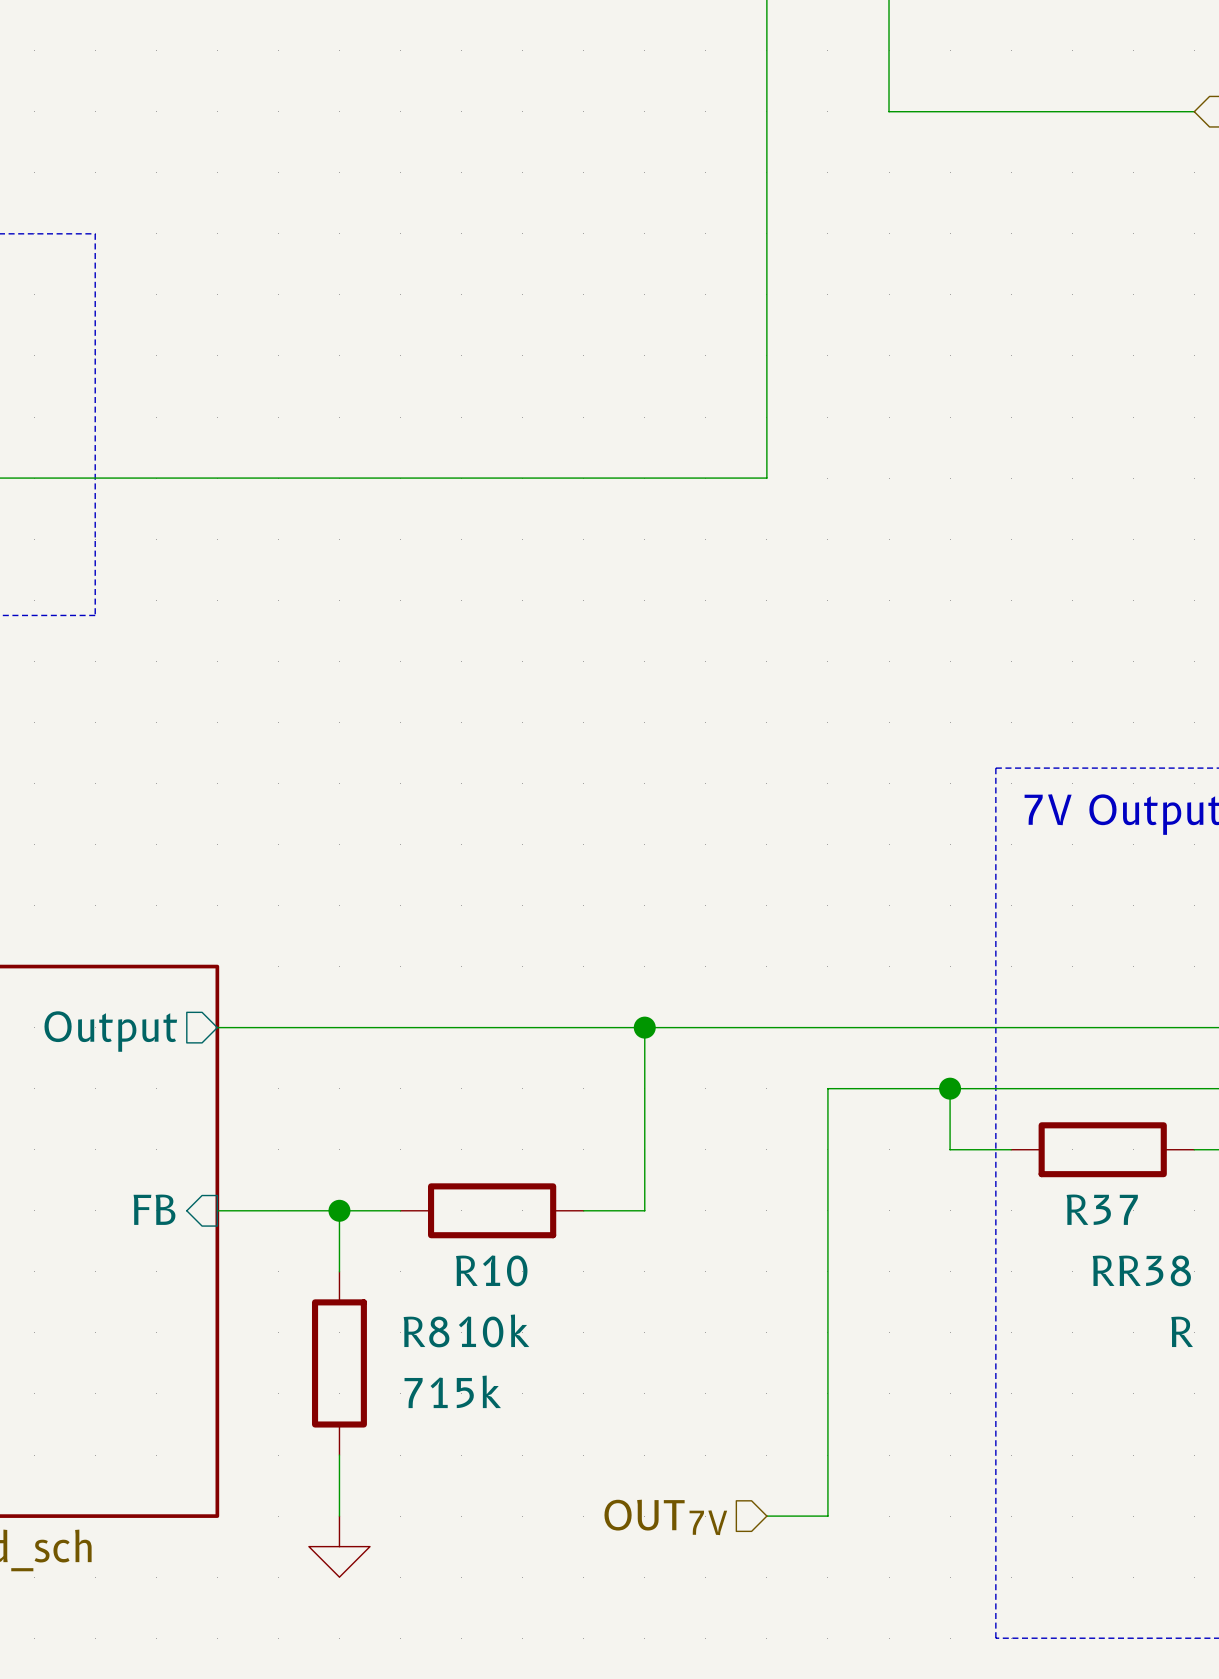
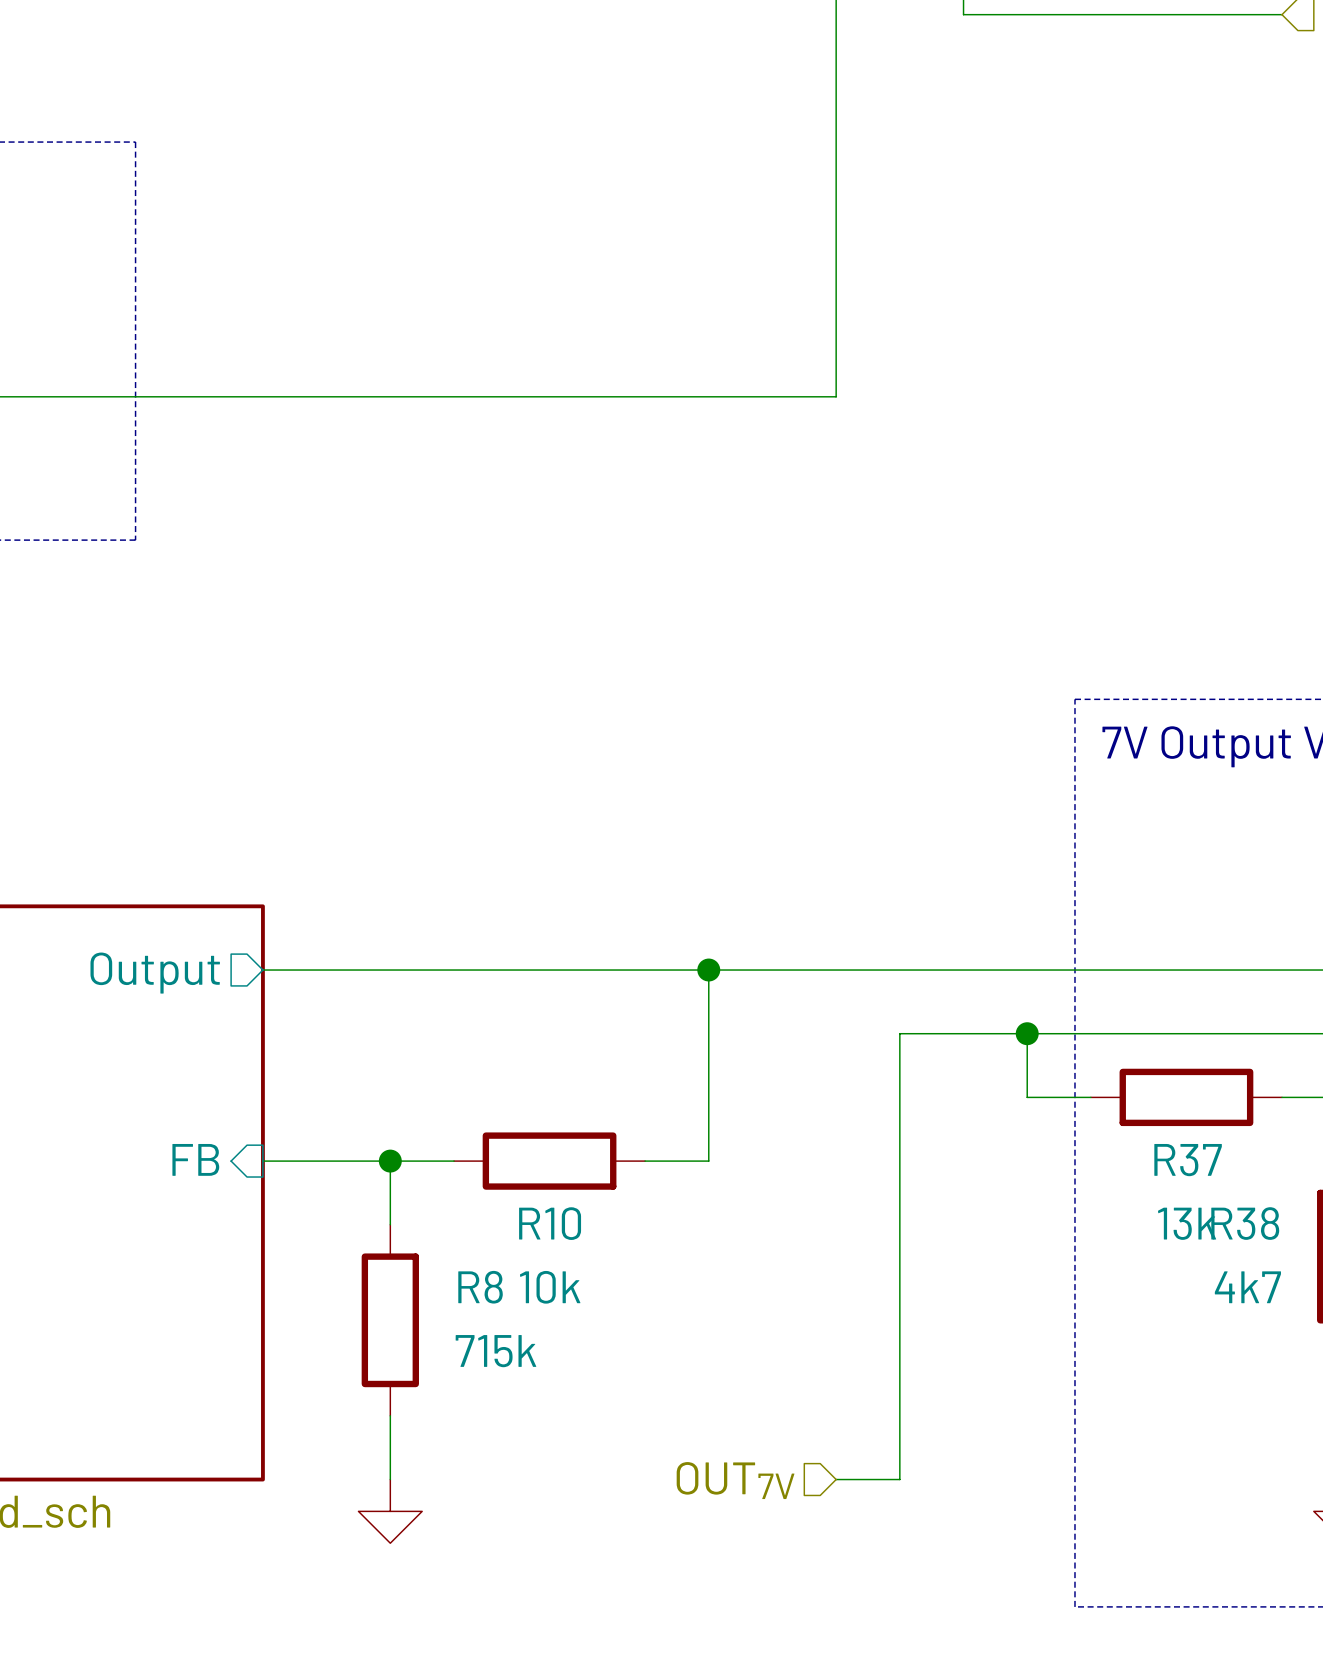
R37 value: R (1103, 1270) -> 13k (1187, 1223)
R38 value: R (1182, 1331) -> 4k7 (1247, 1287)

